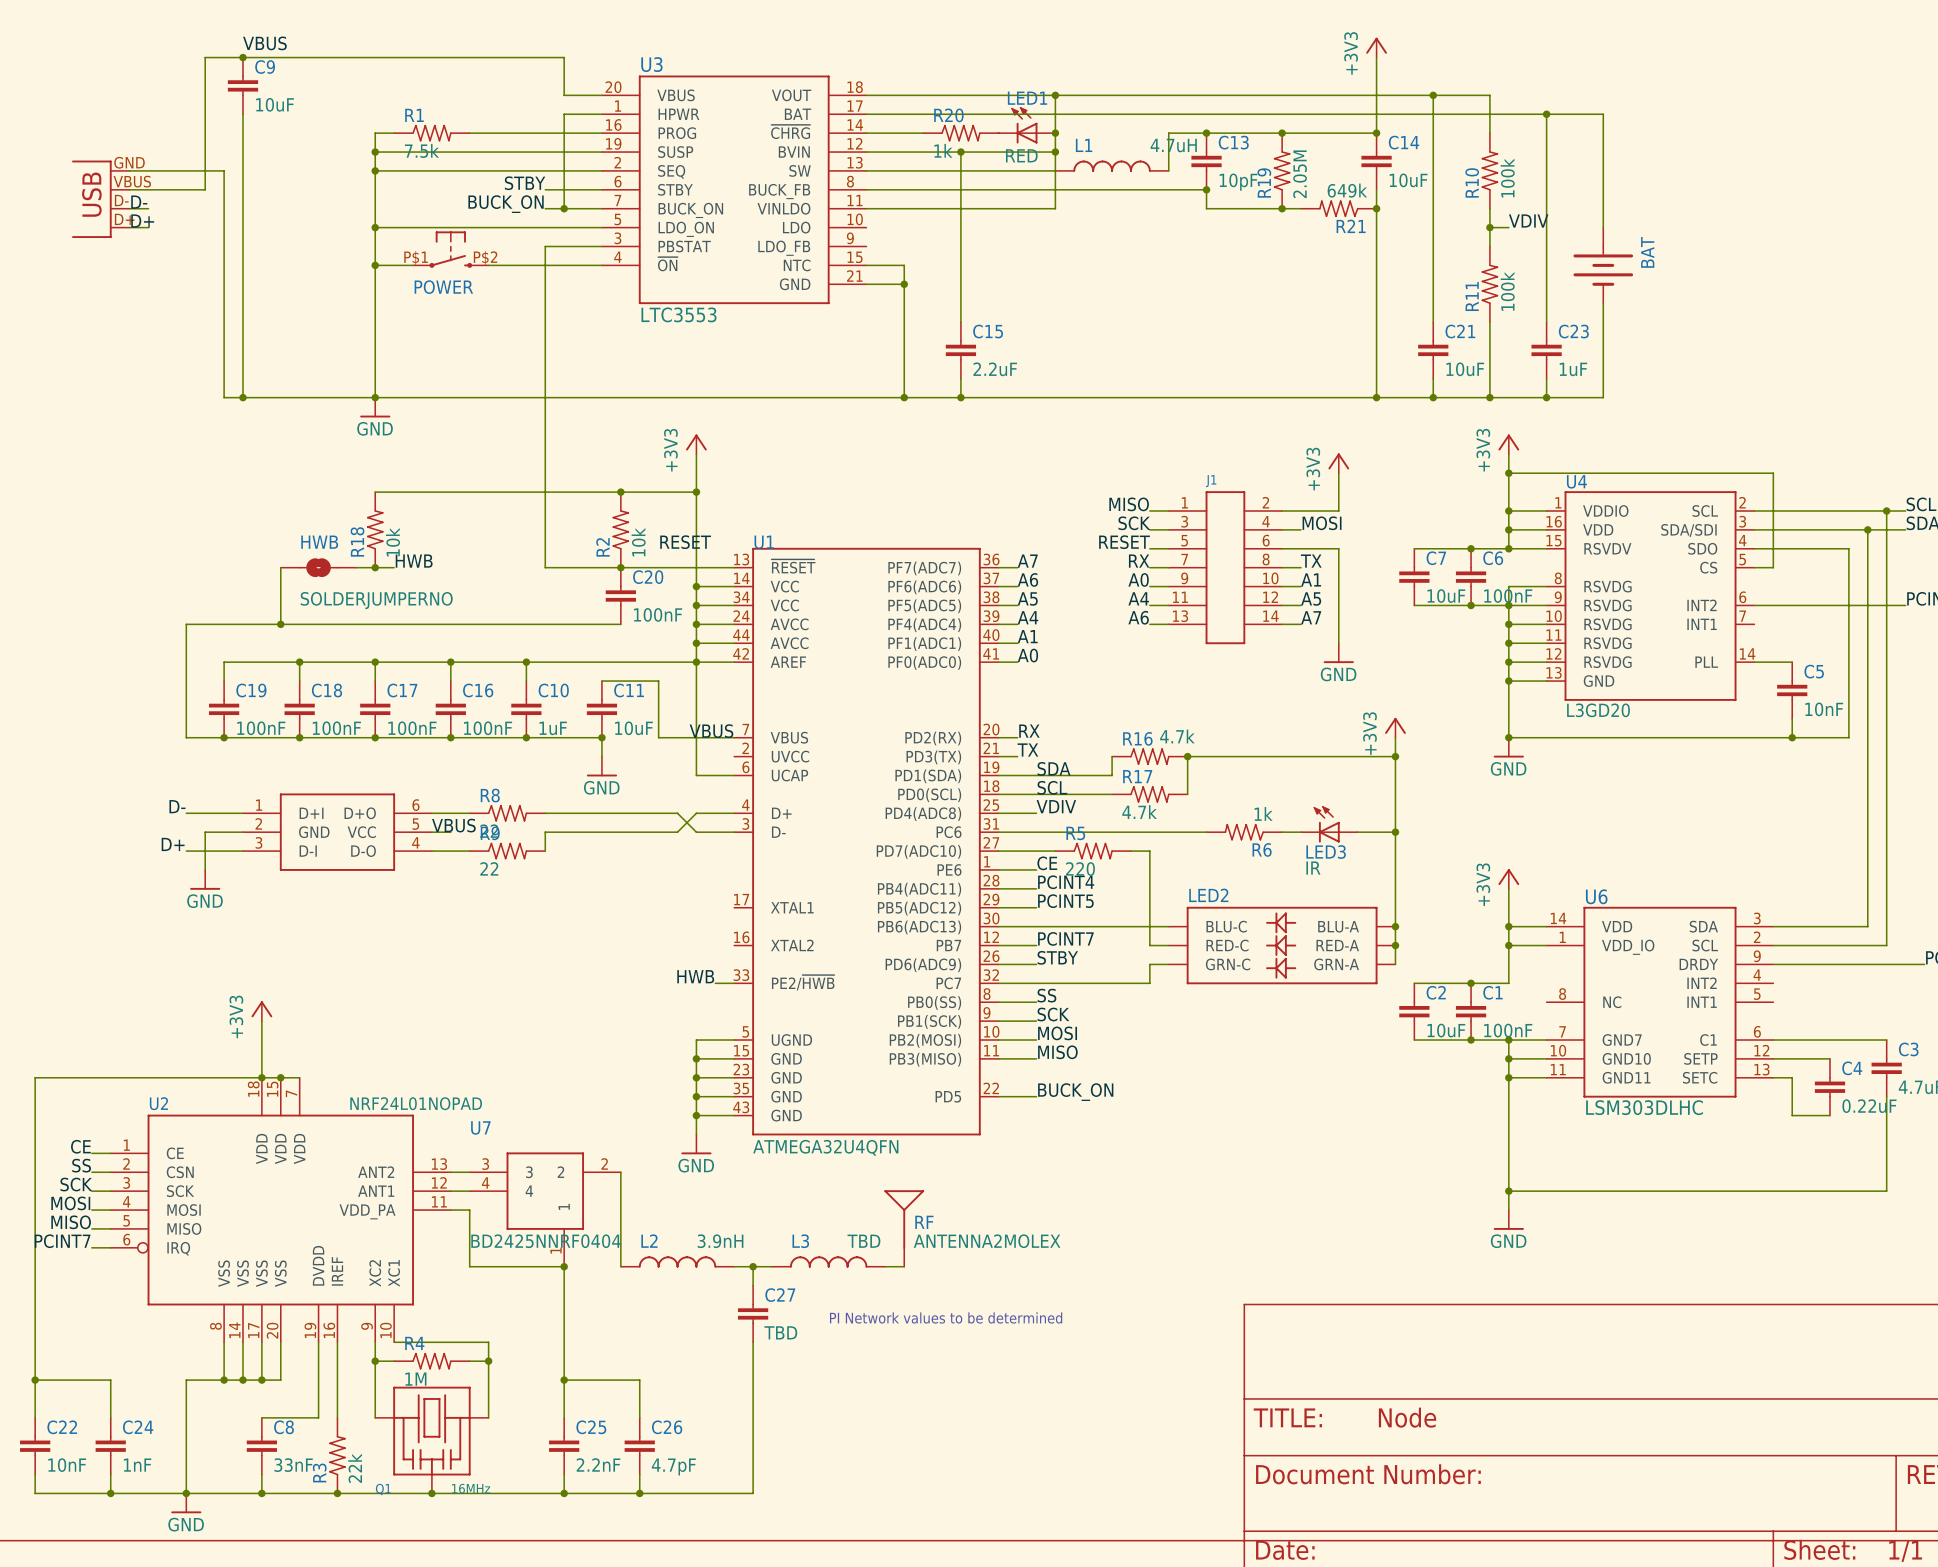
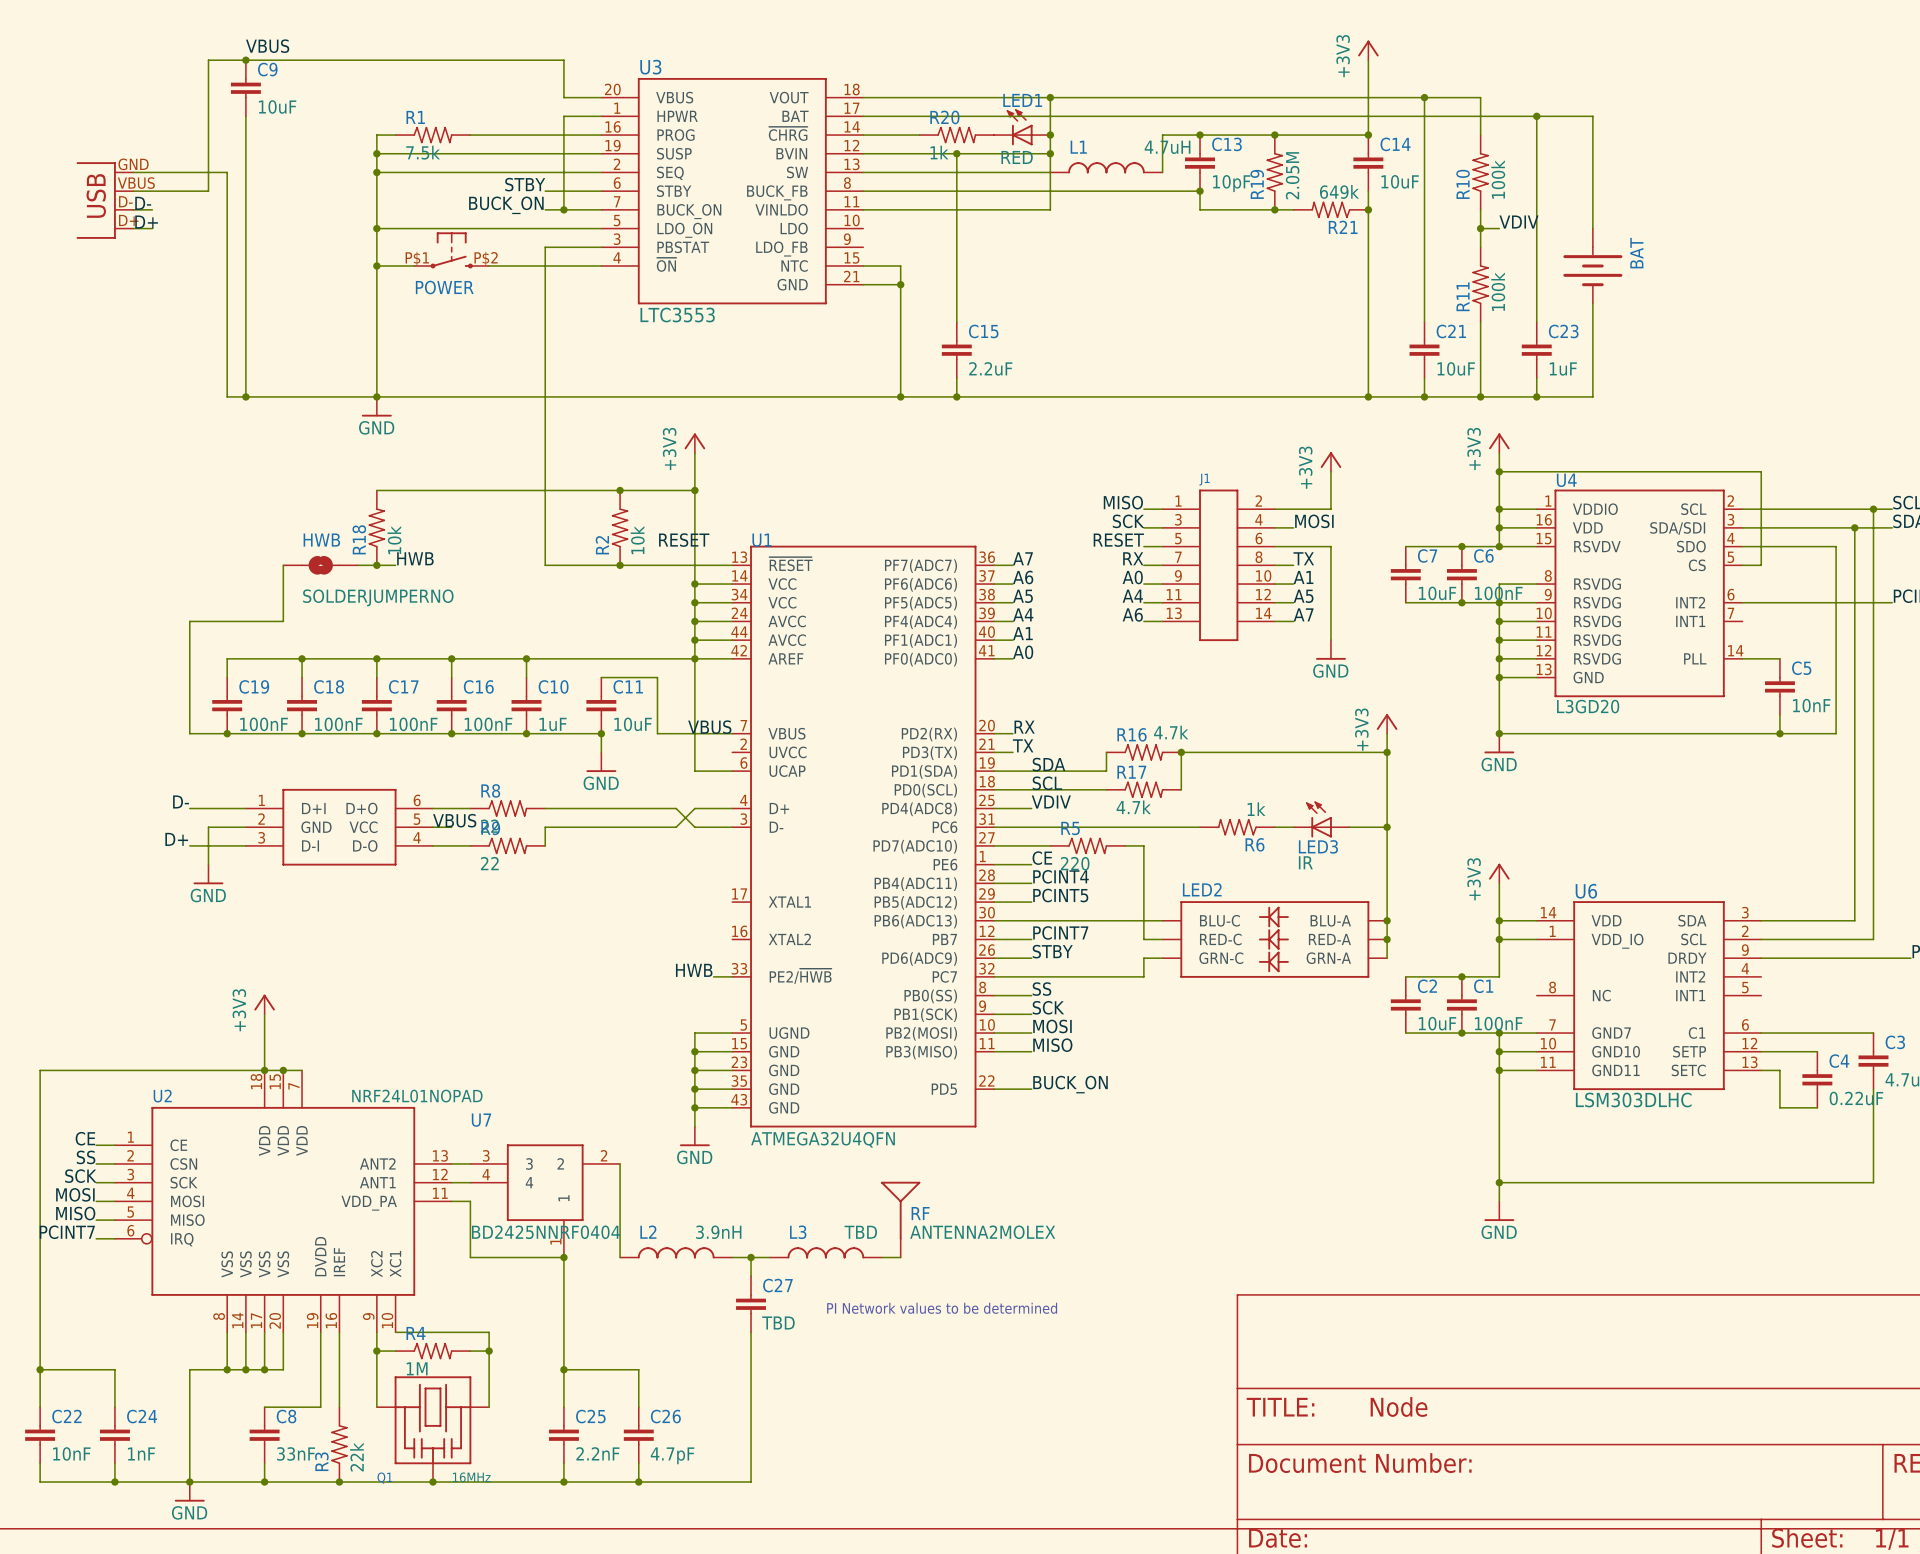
C20: 100nF (620, 596) -> none
wire: (280, 624) (620, 624) -> none
junction: (280, 624) -> none

